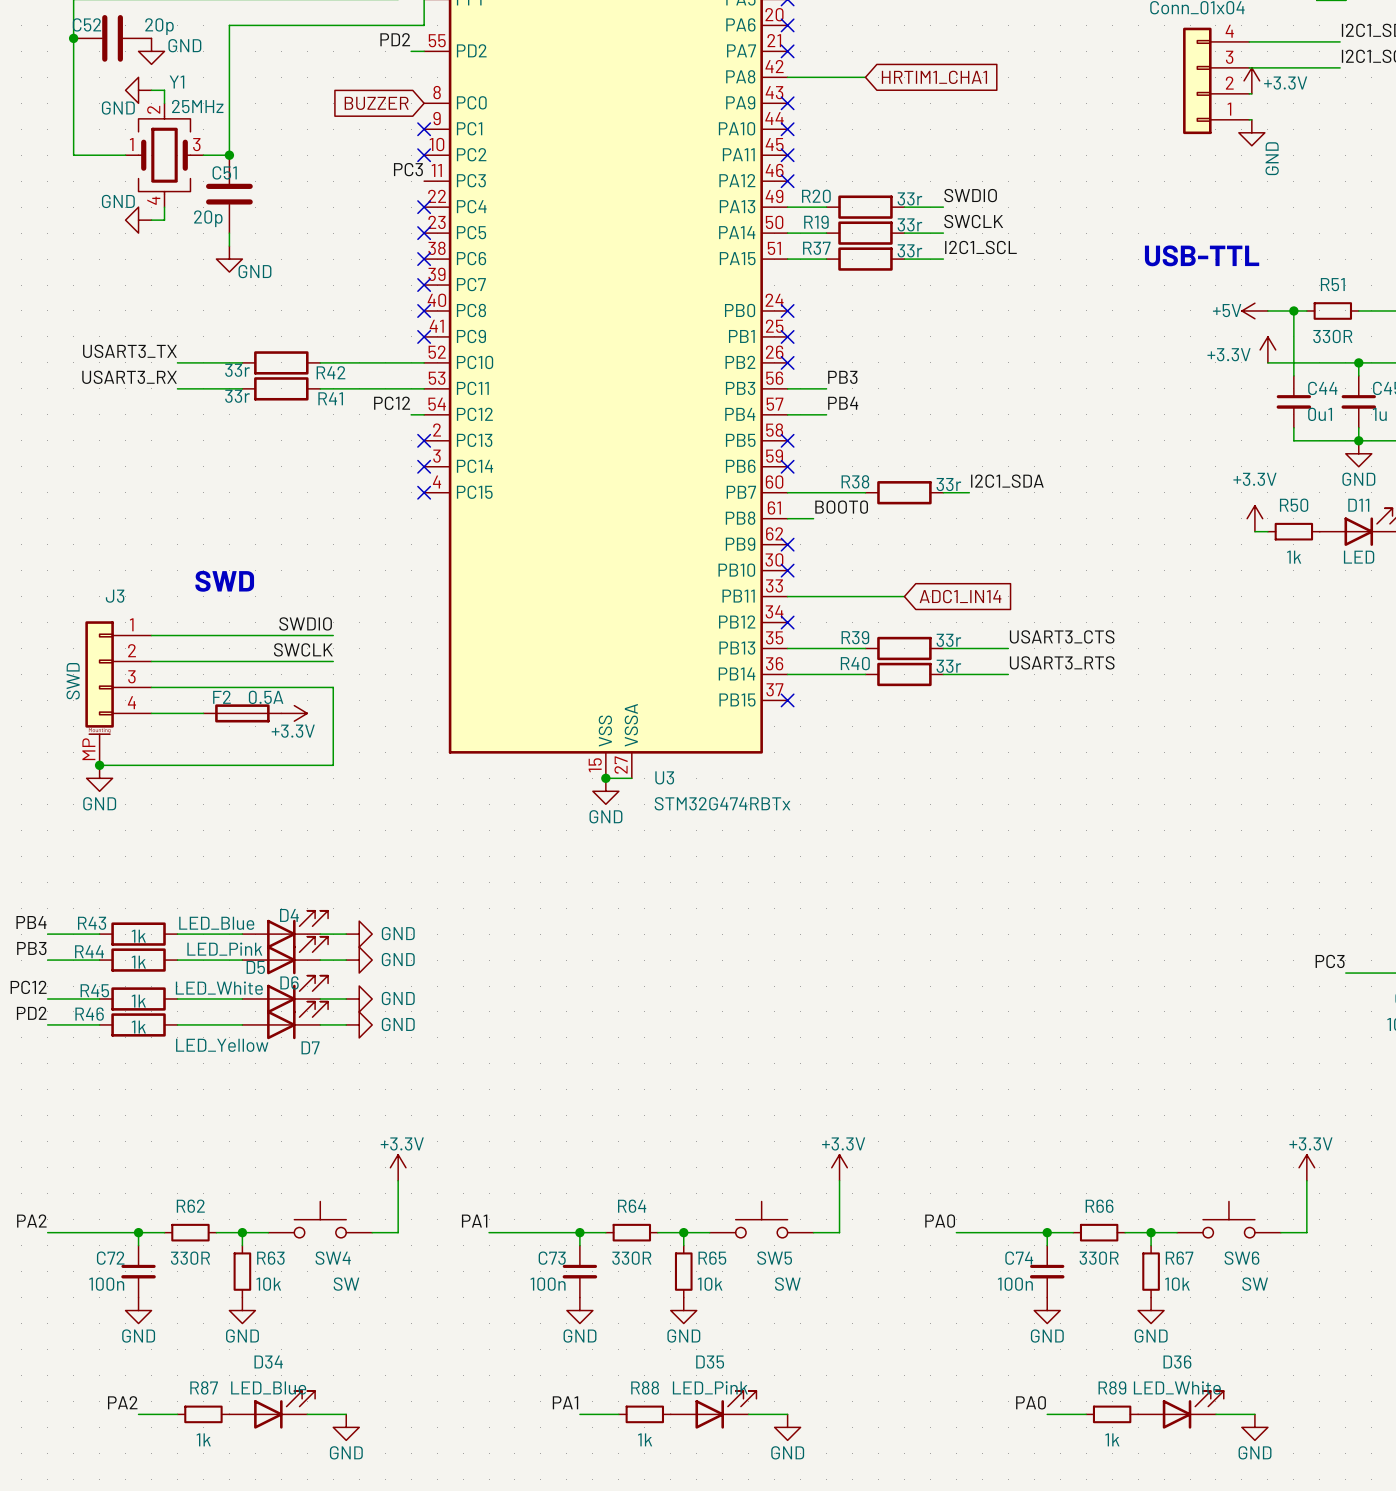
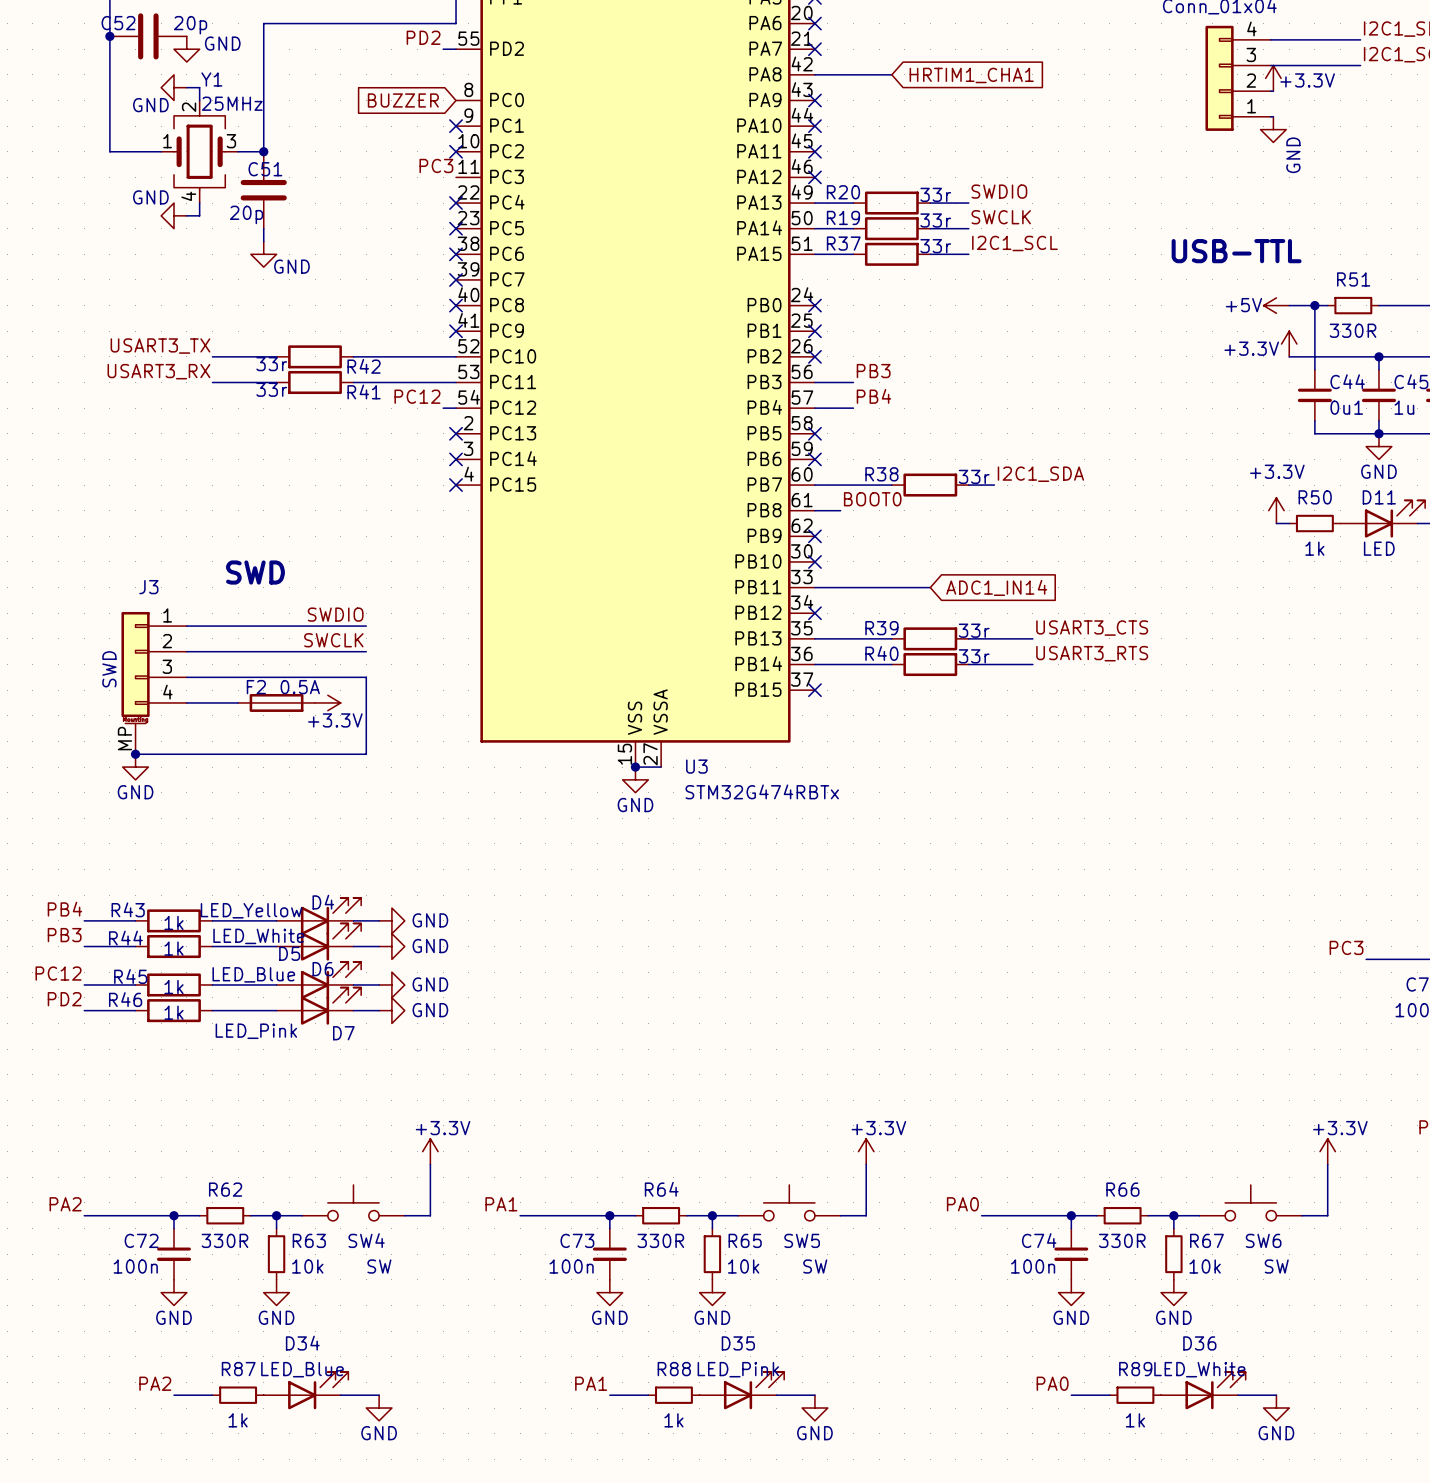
D4 value: LED_Blue (216, 923) -> LED_Yellow (251, 910)
D5 value: LED_Pink (224, 949) -> LED_White (258, 936)
D6 value: LED_White (219, 988) -> LED_Blue (253, 974)
D7 value: LED_Yellow (222, 1045) -> LED_Pink (256, 1031)

